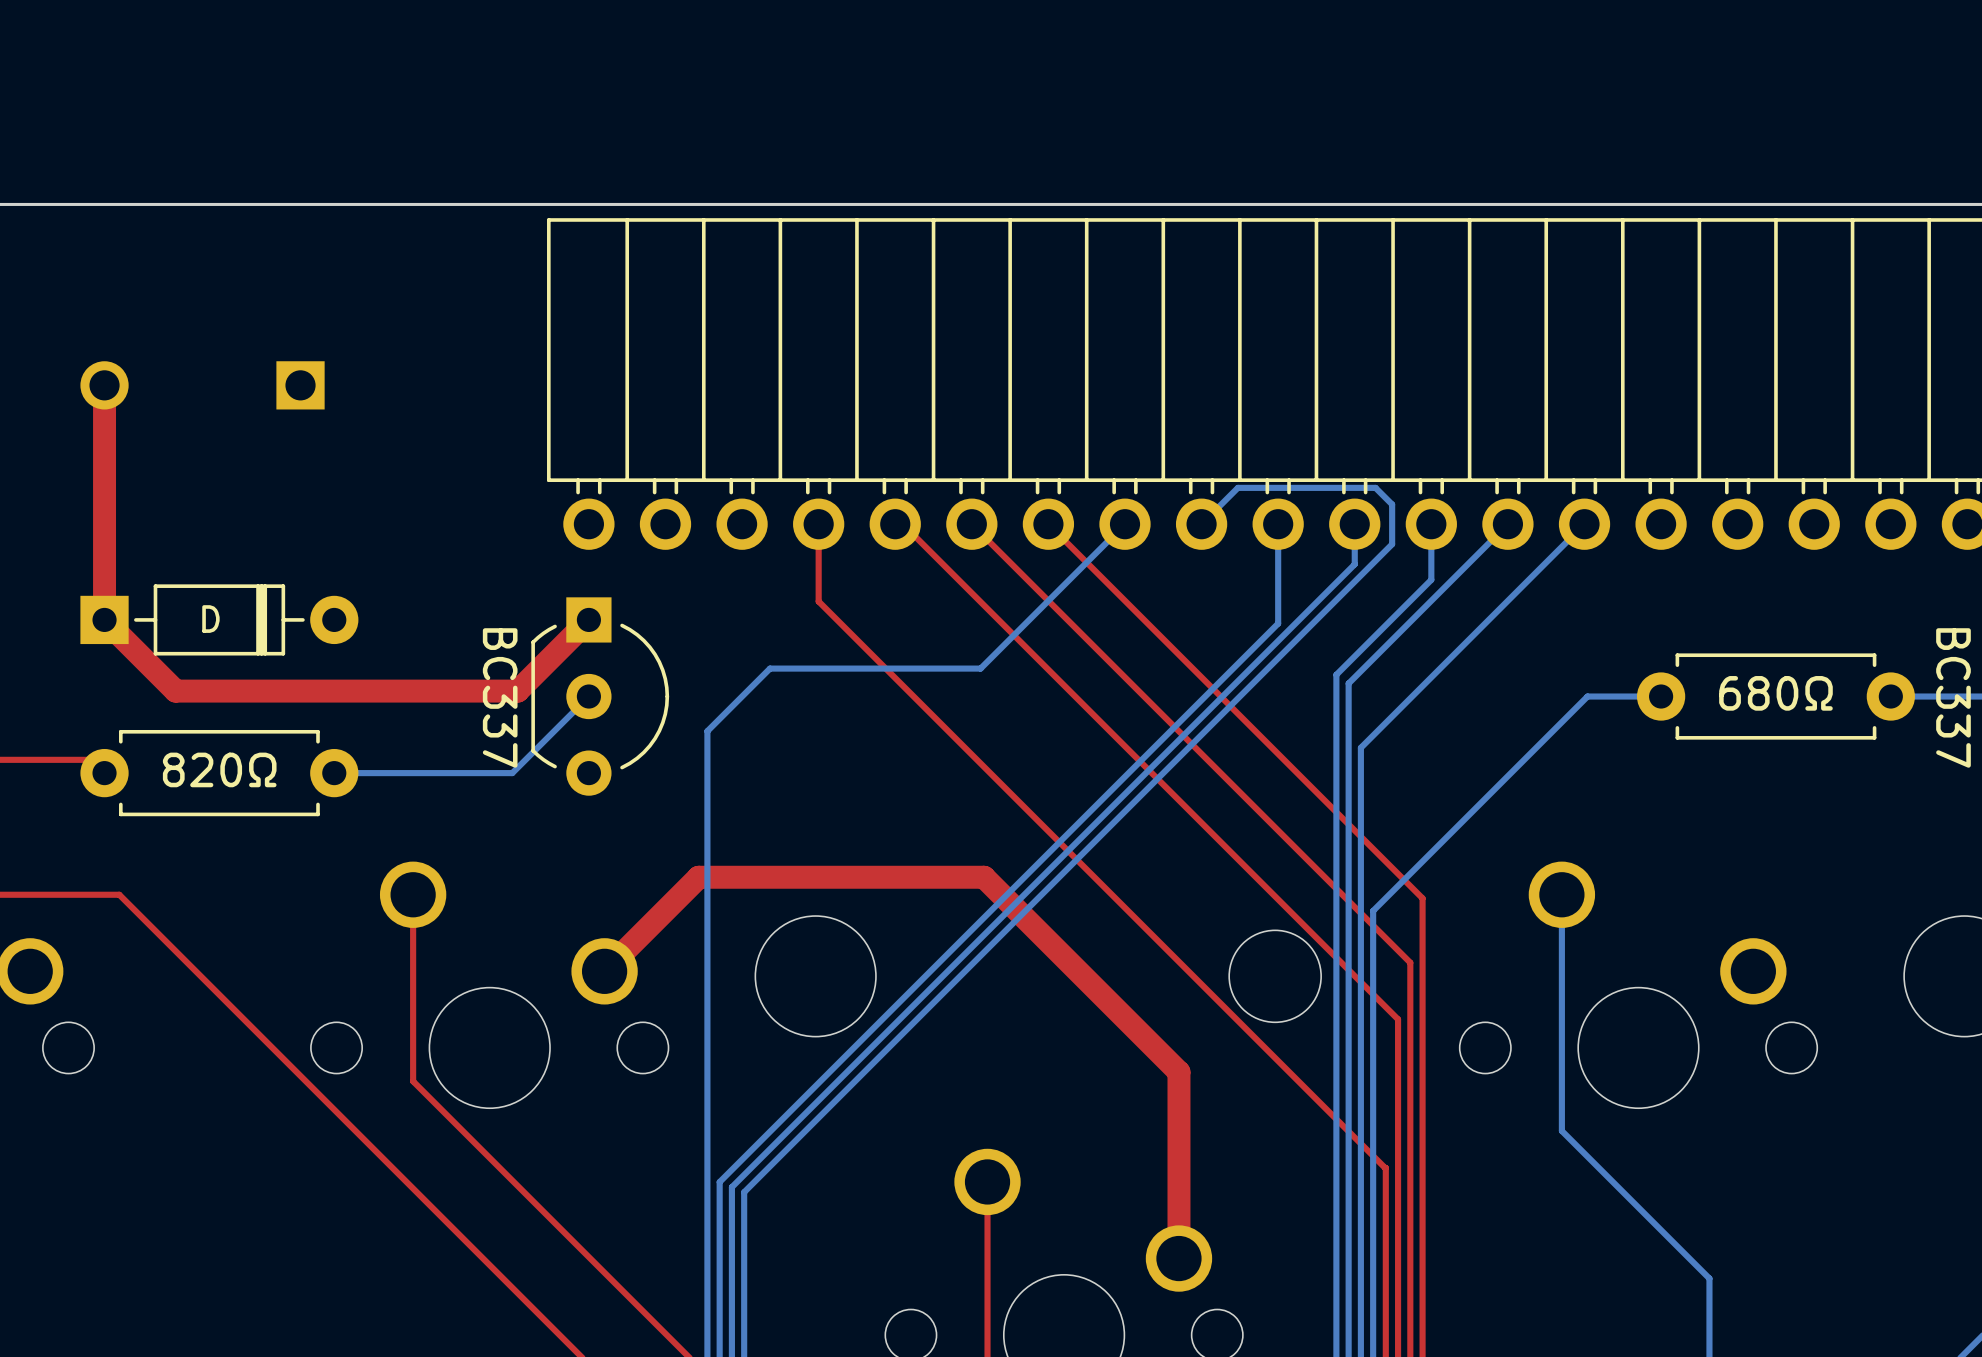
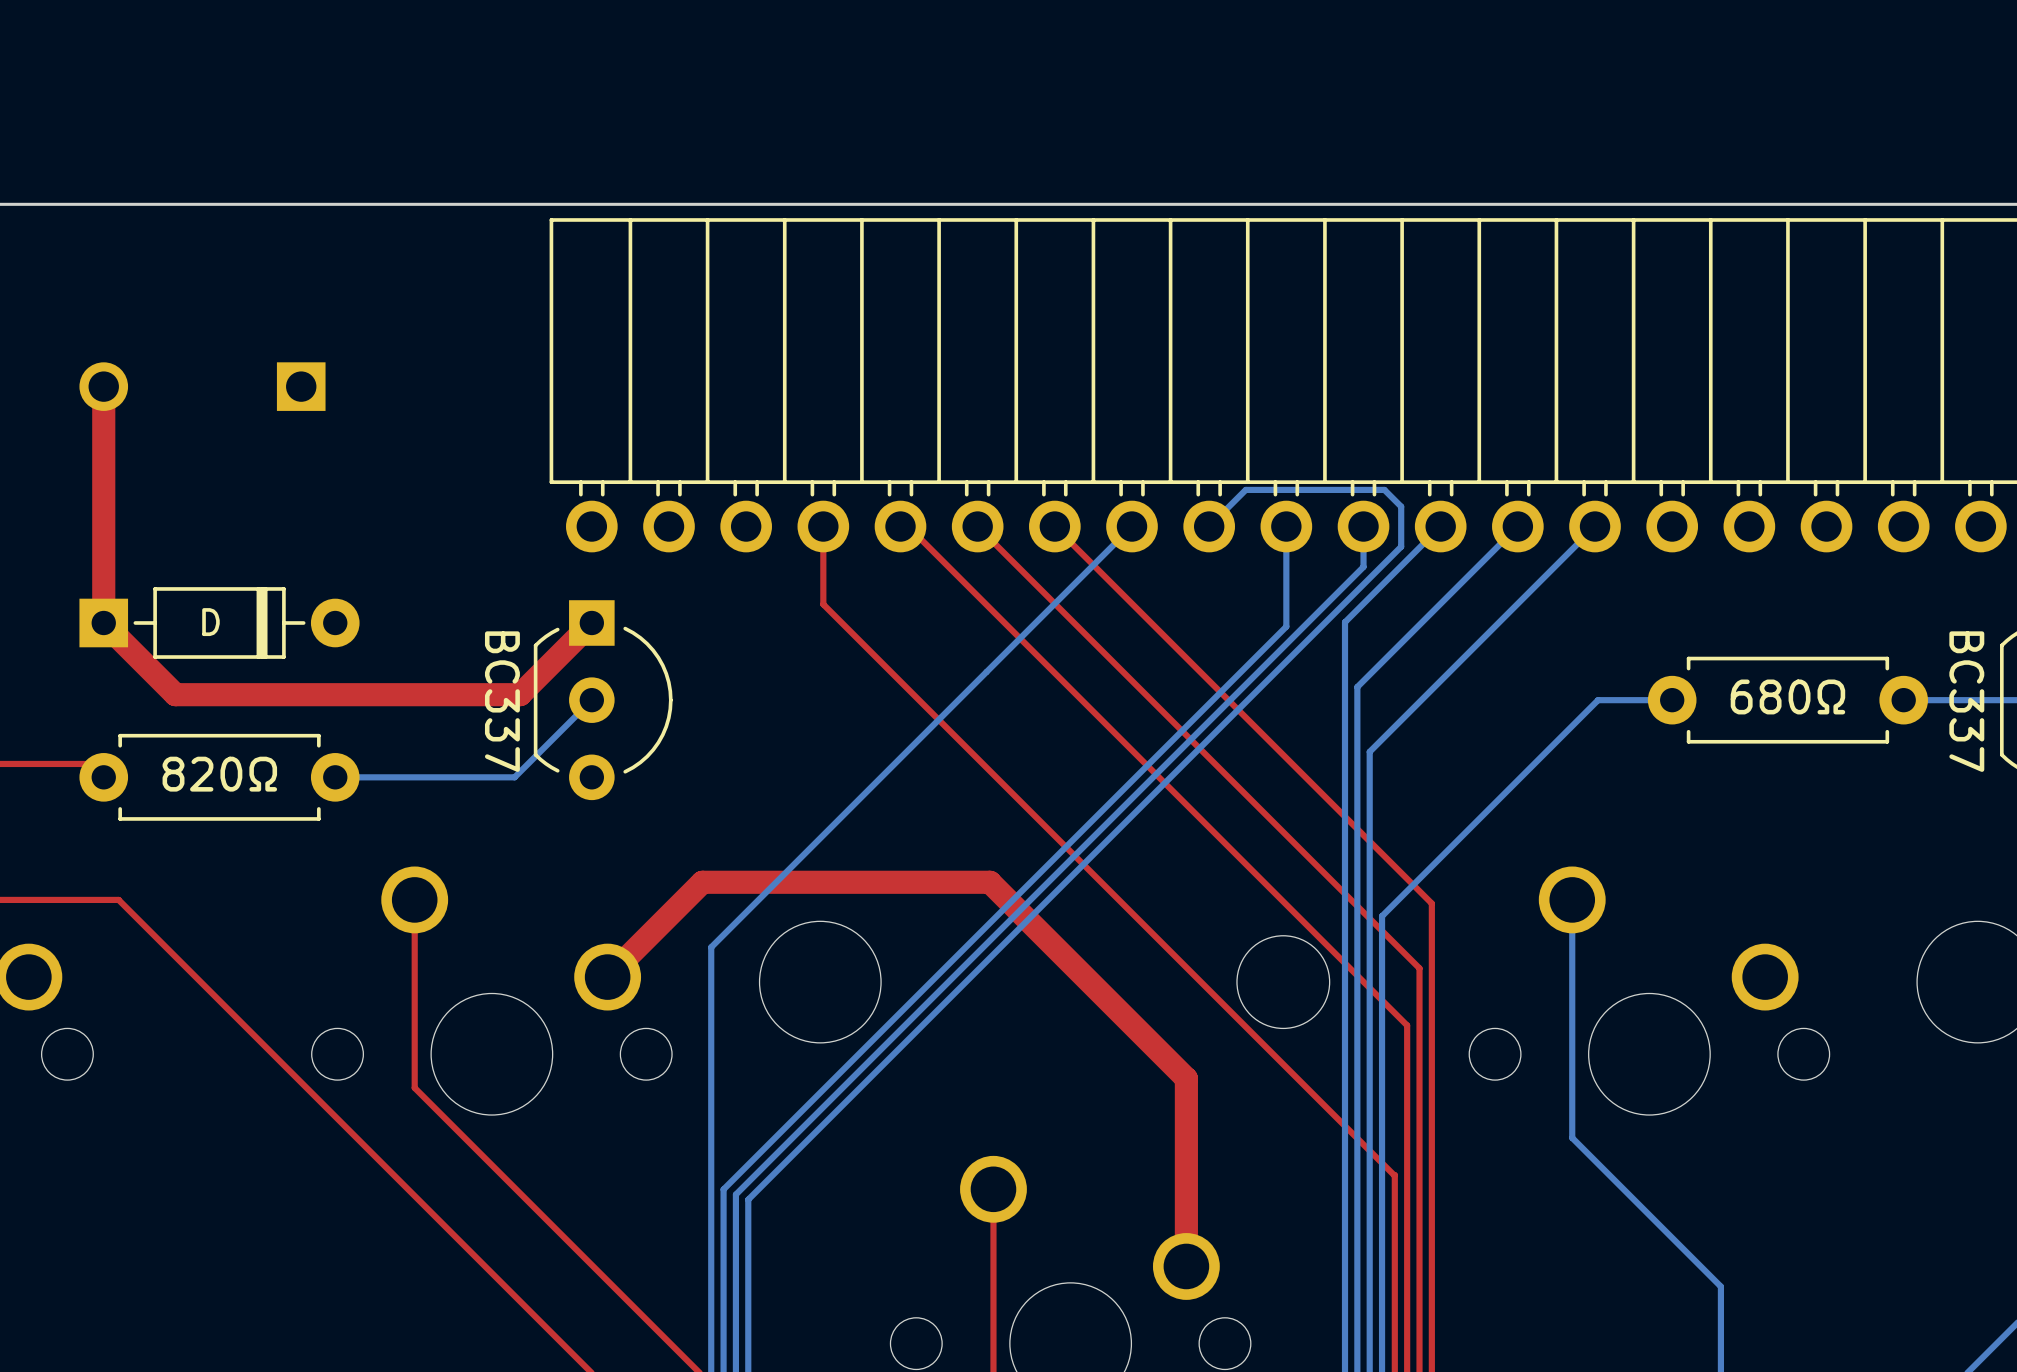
bottom track: (1431, 524) (1431, 579) (1336, 674) -> (1440, 526) (1345, 622) (1345, 678)
bottom track: (980, 668) (770, 668) (707, 731) (707, 941) -> (986, 672) (711, 947)

